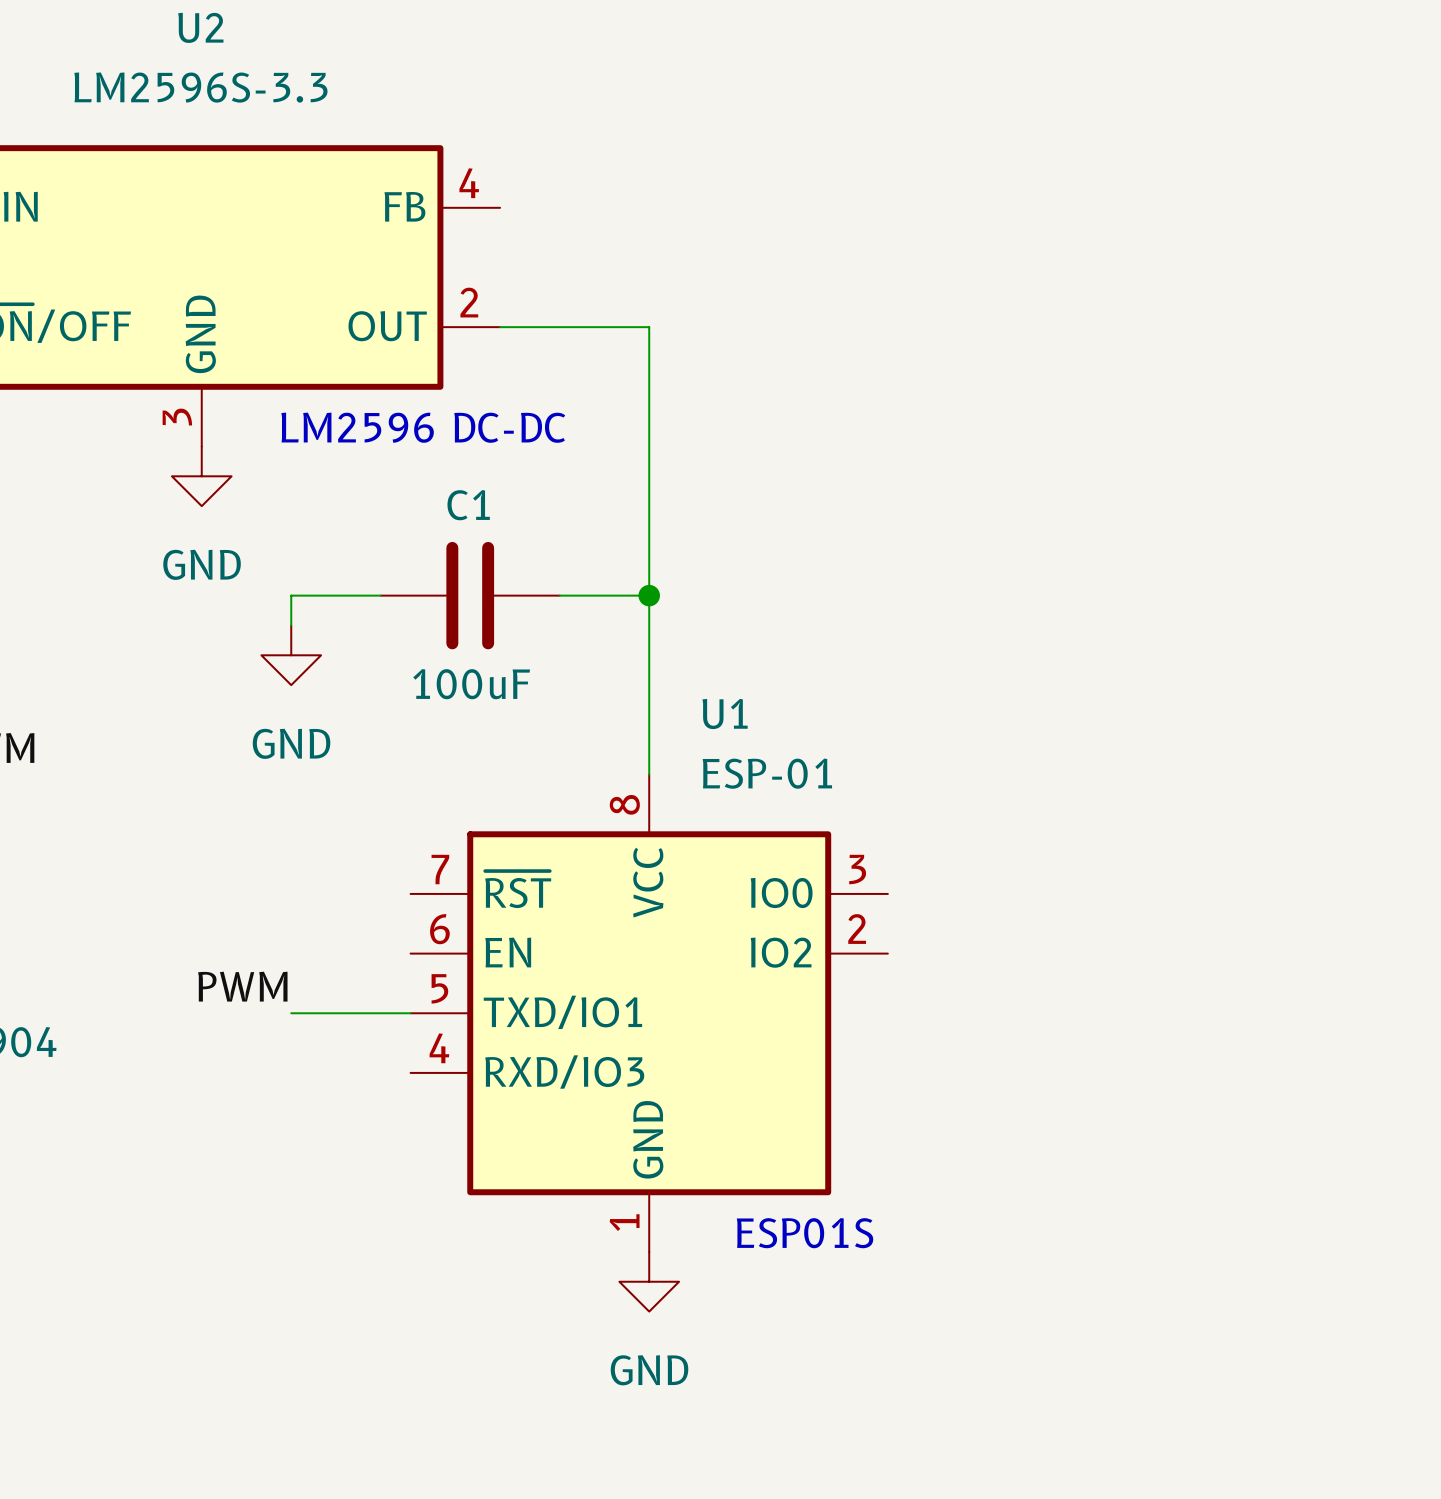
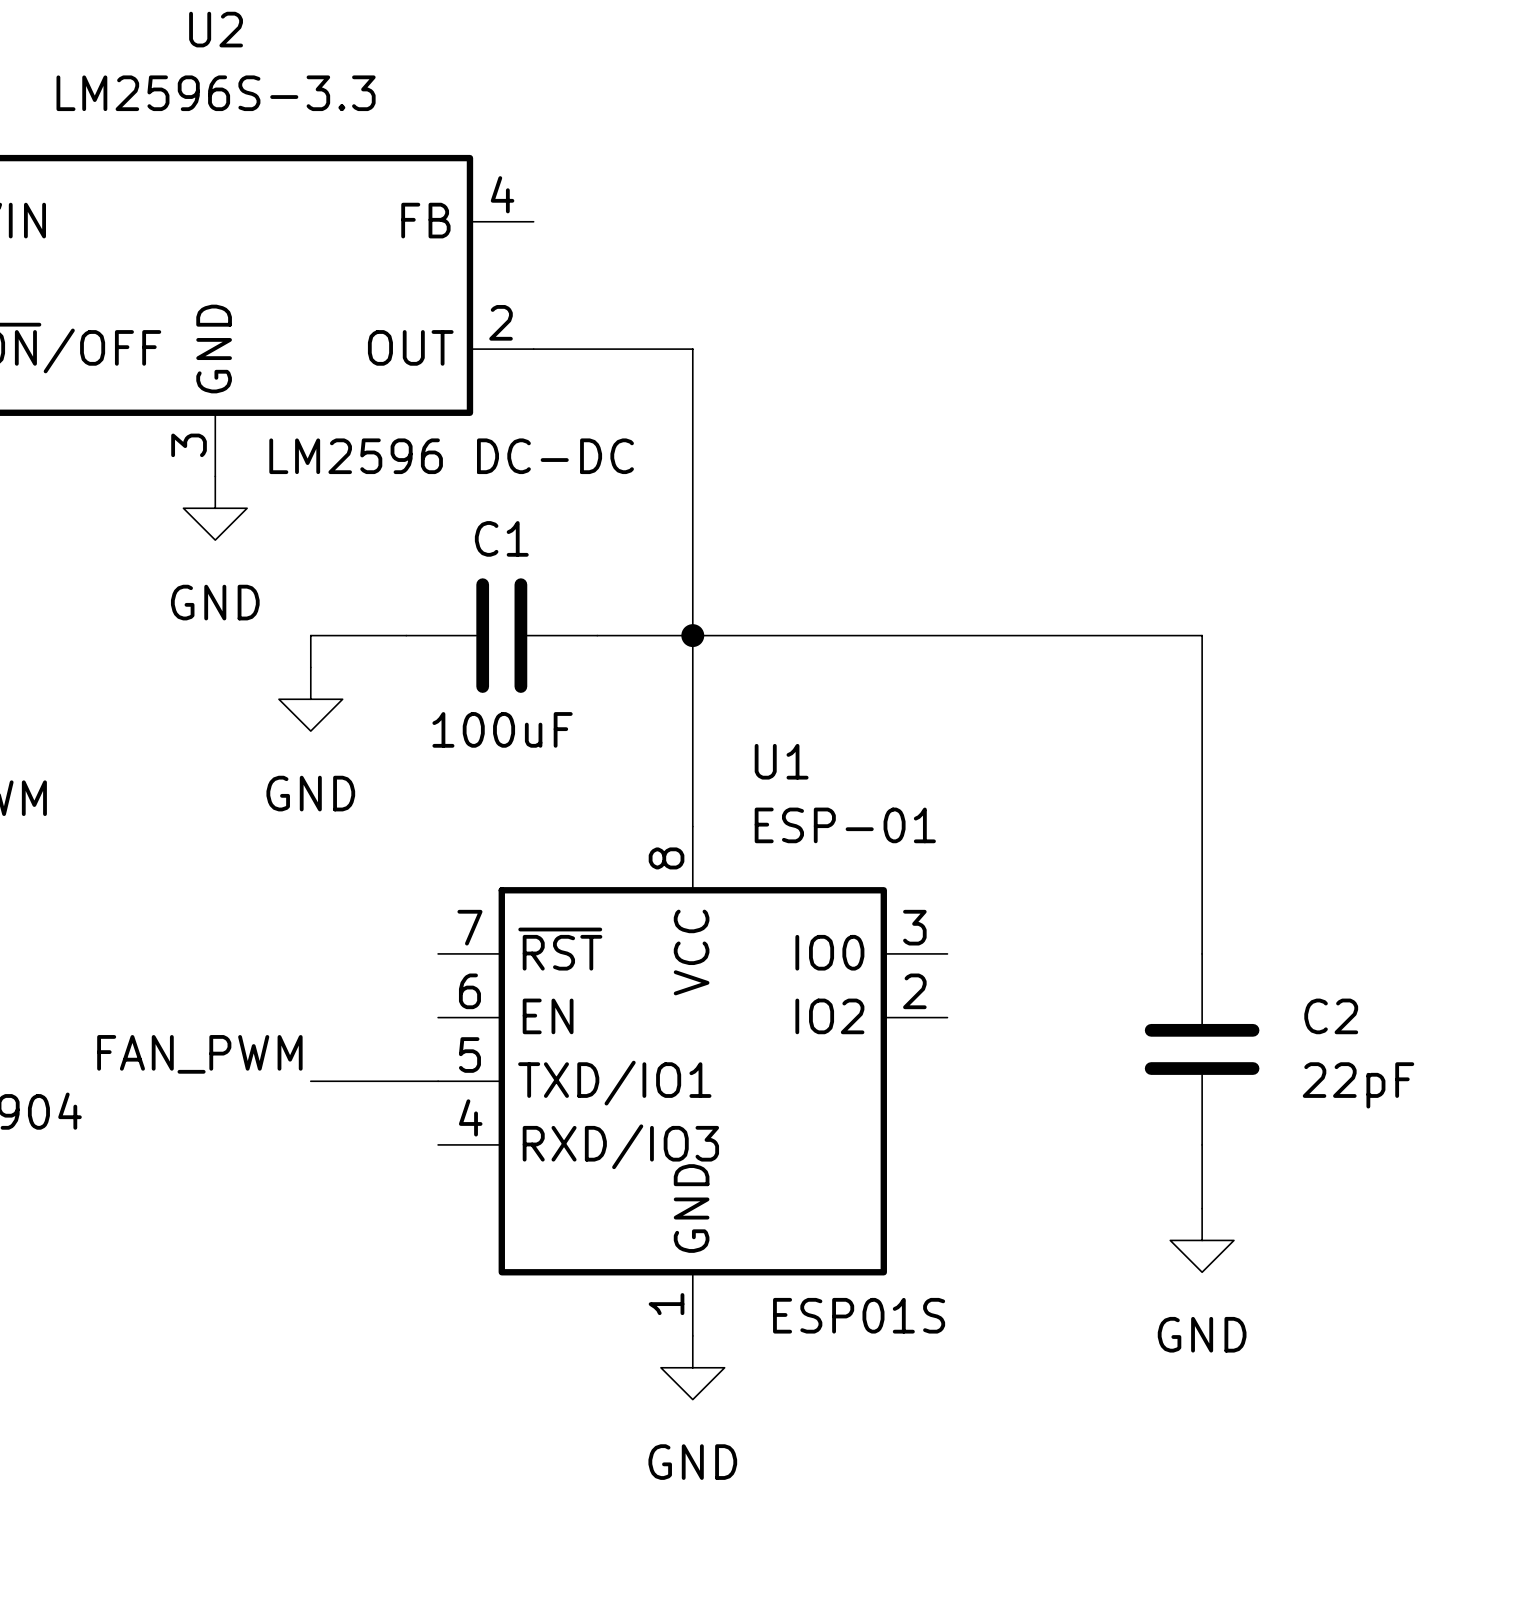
wire: none -> (692, 635) (1202, 635) (1202, 953)
C2: none -> 22pF (1202, 1049)
label: PWM (242, 986) -> FAN_PWM (199, 1054)
wire: none -> (1202, 1144) (1202, 1208)
power symbol: none -> GND (1202, 1240)

